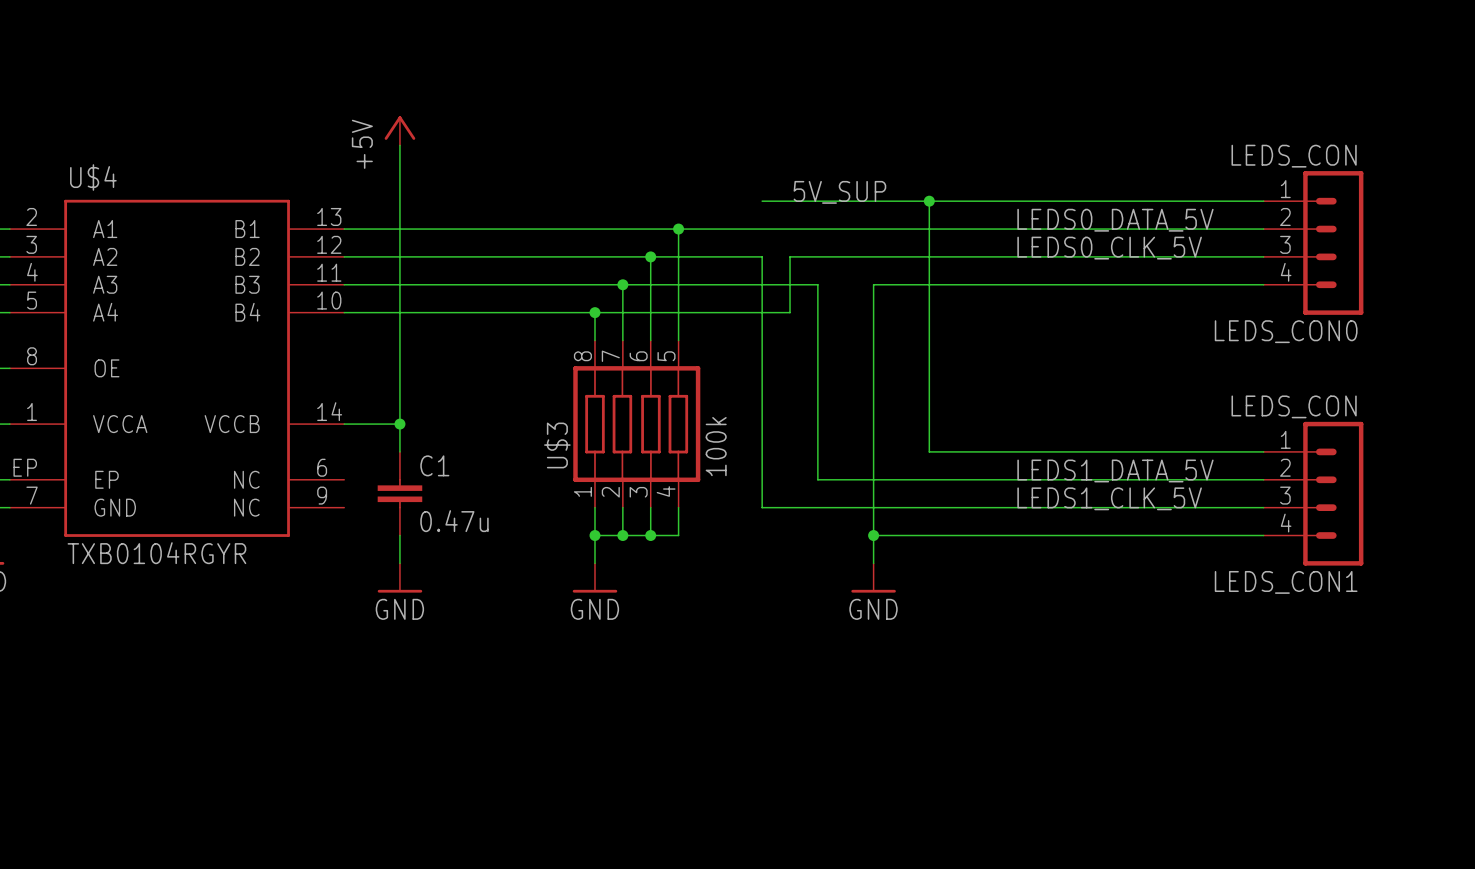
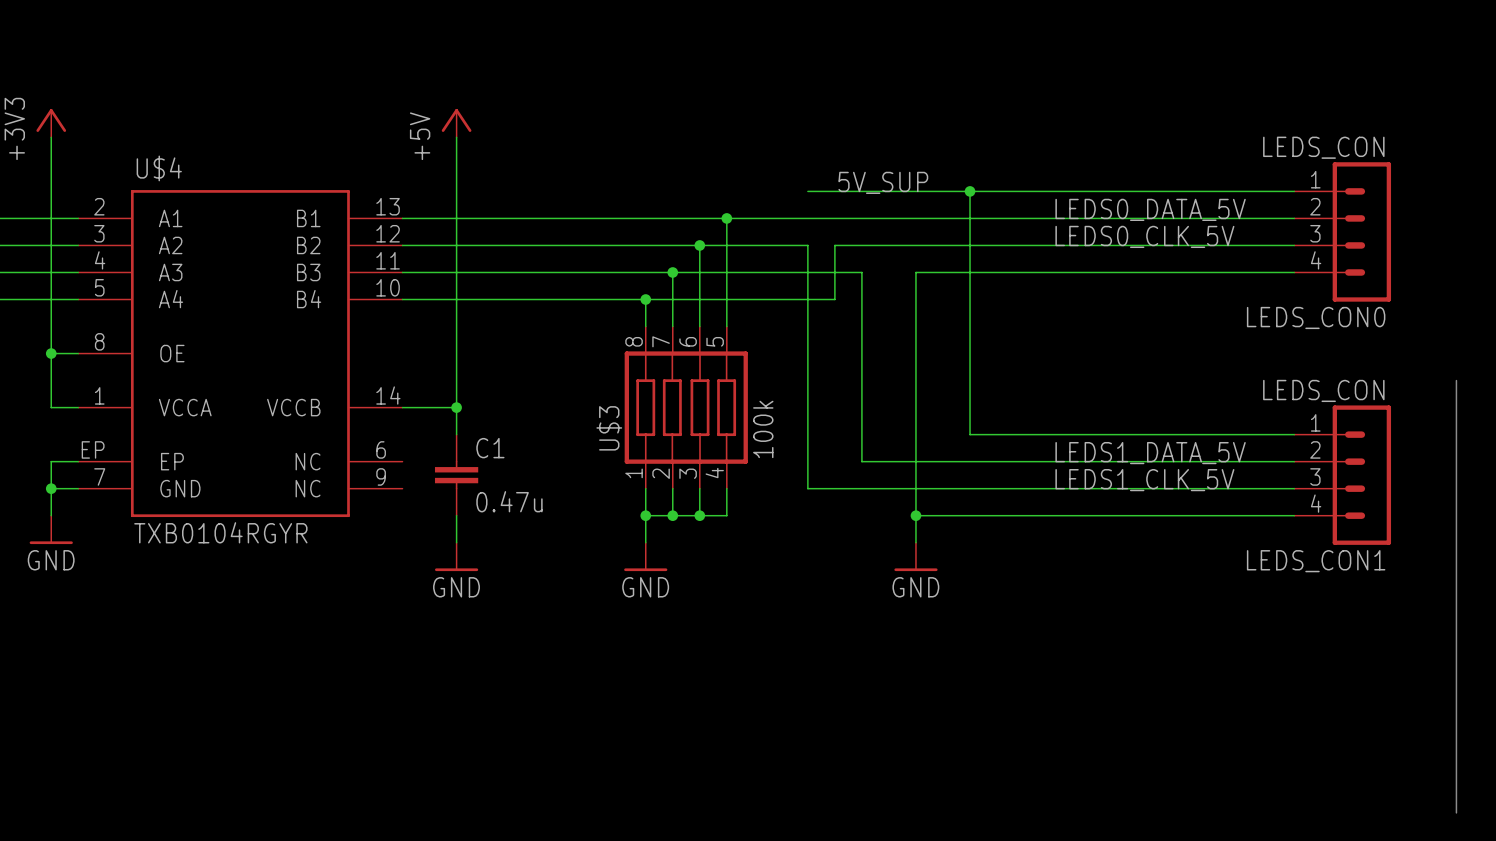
bus: none -> (1456, 380) (1456, 812)

